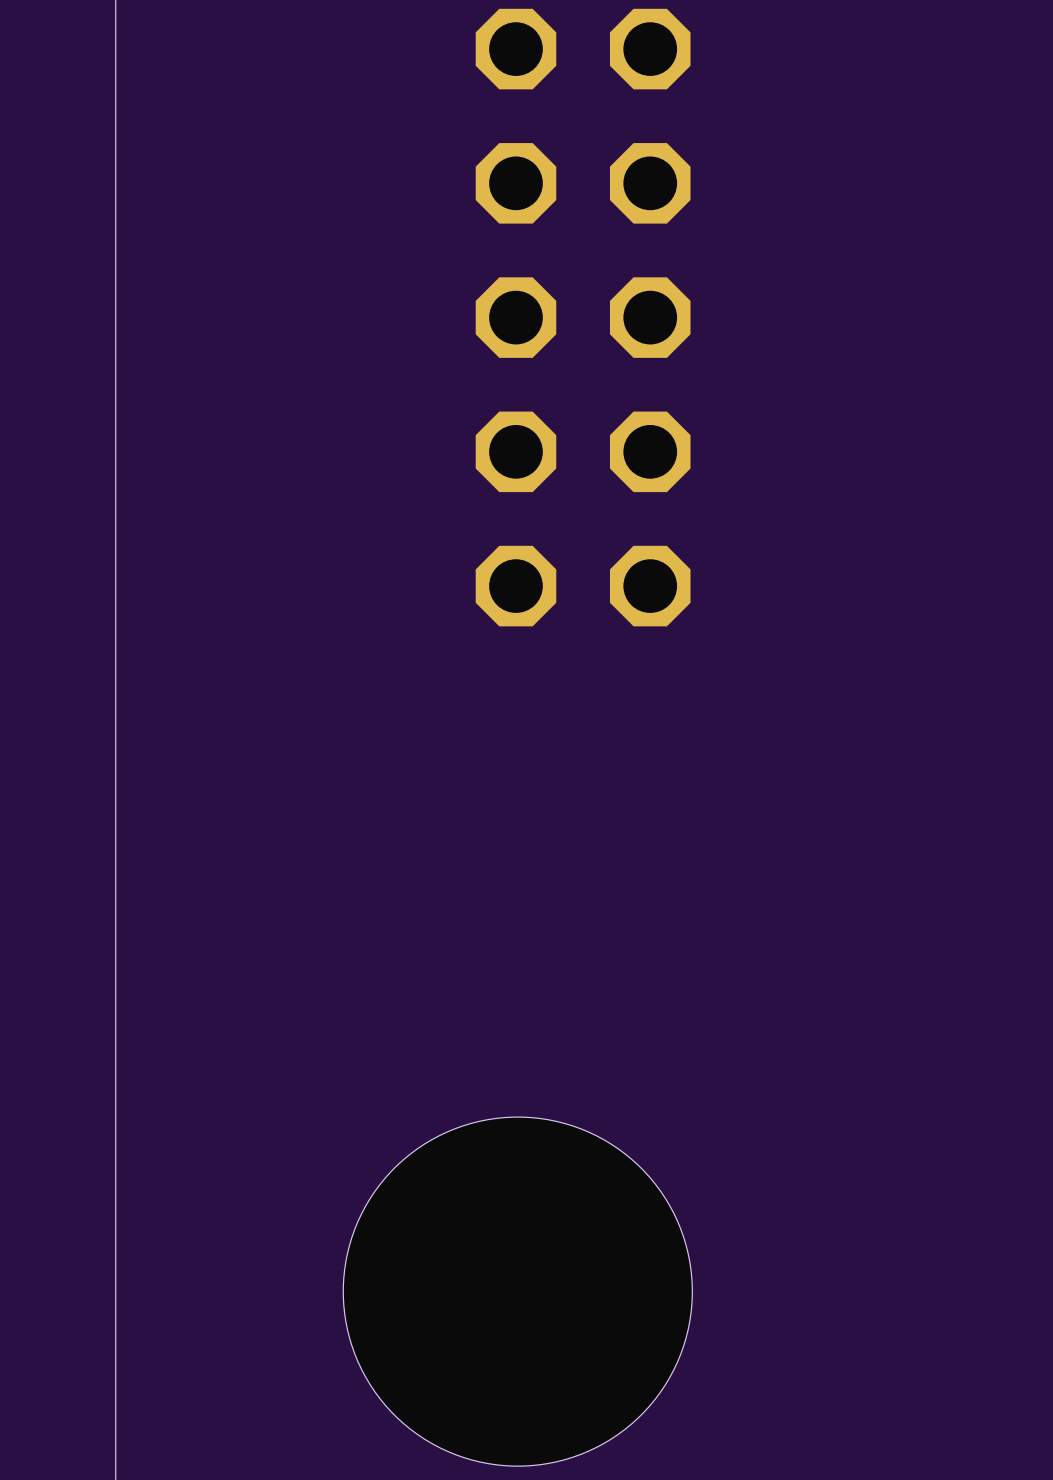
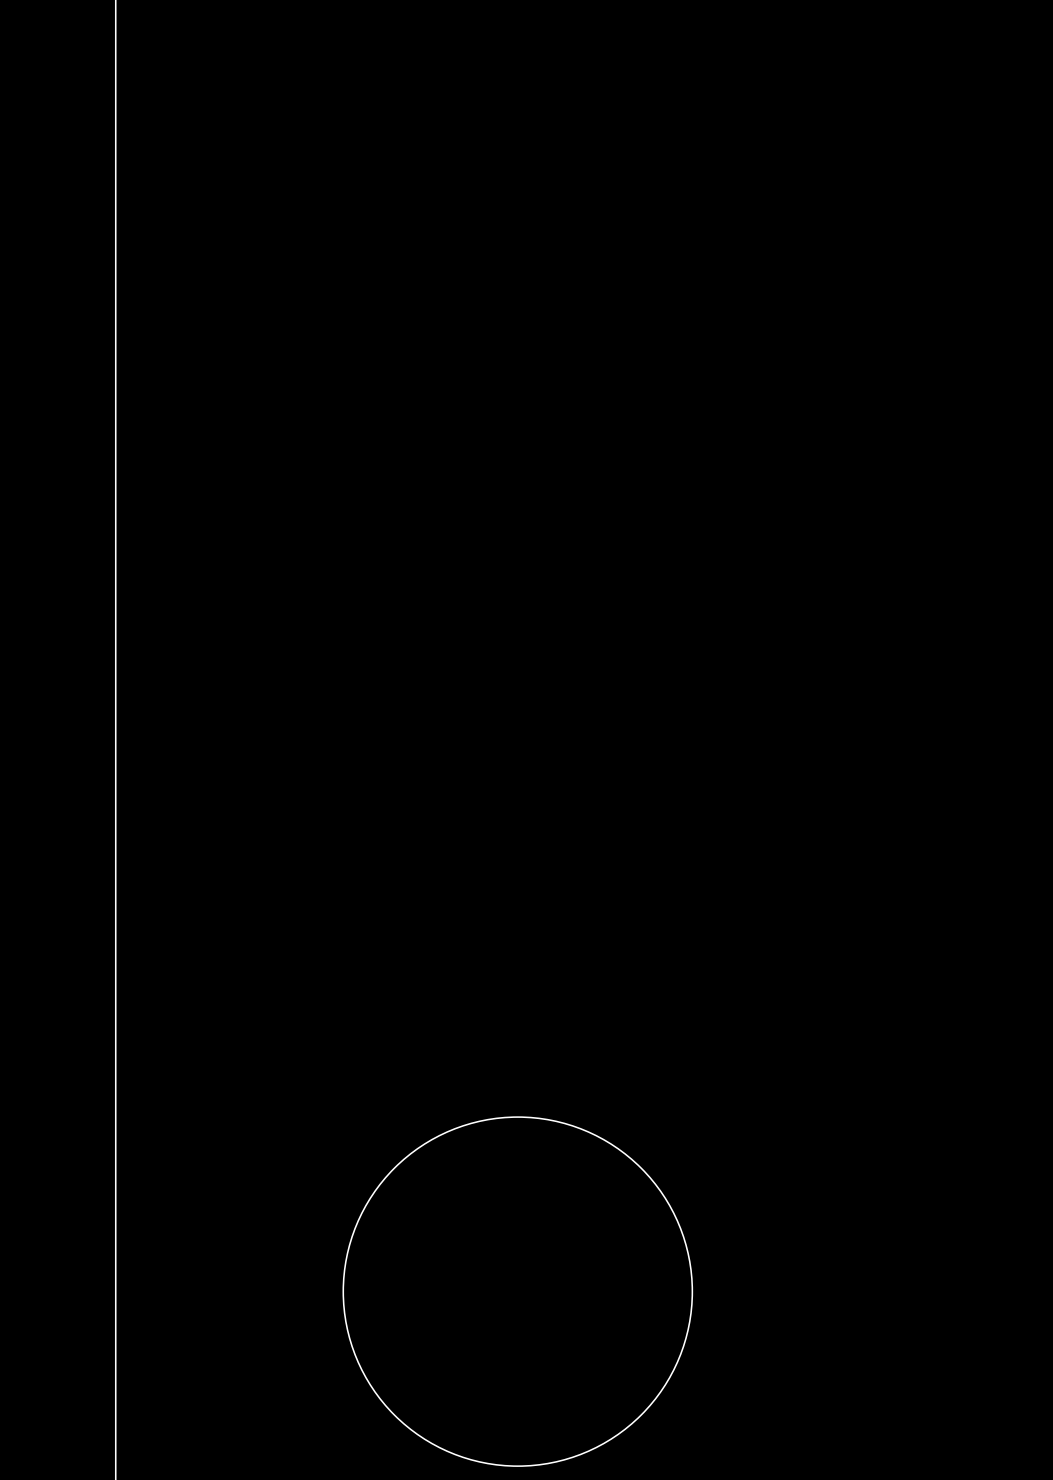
part: (583, 317) -> none

